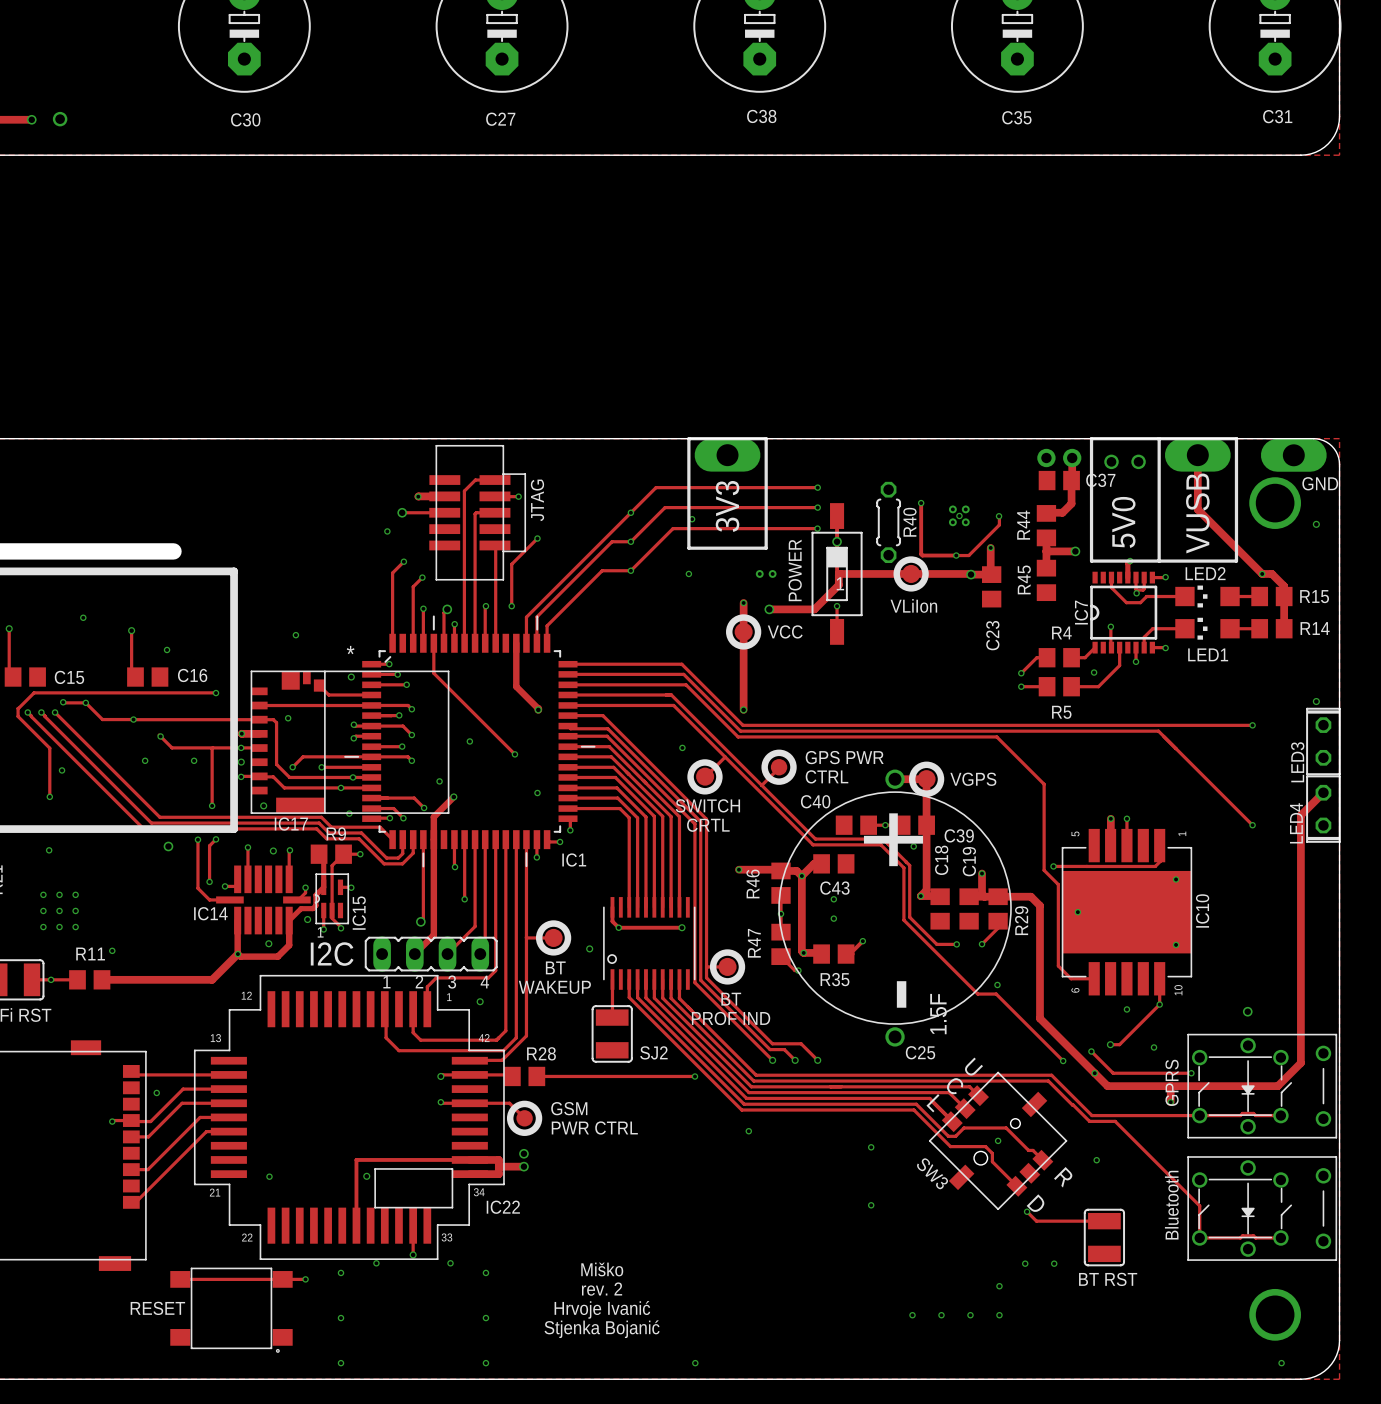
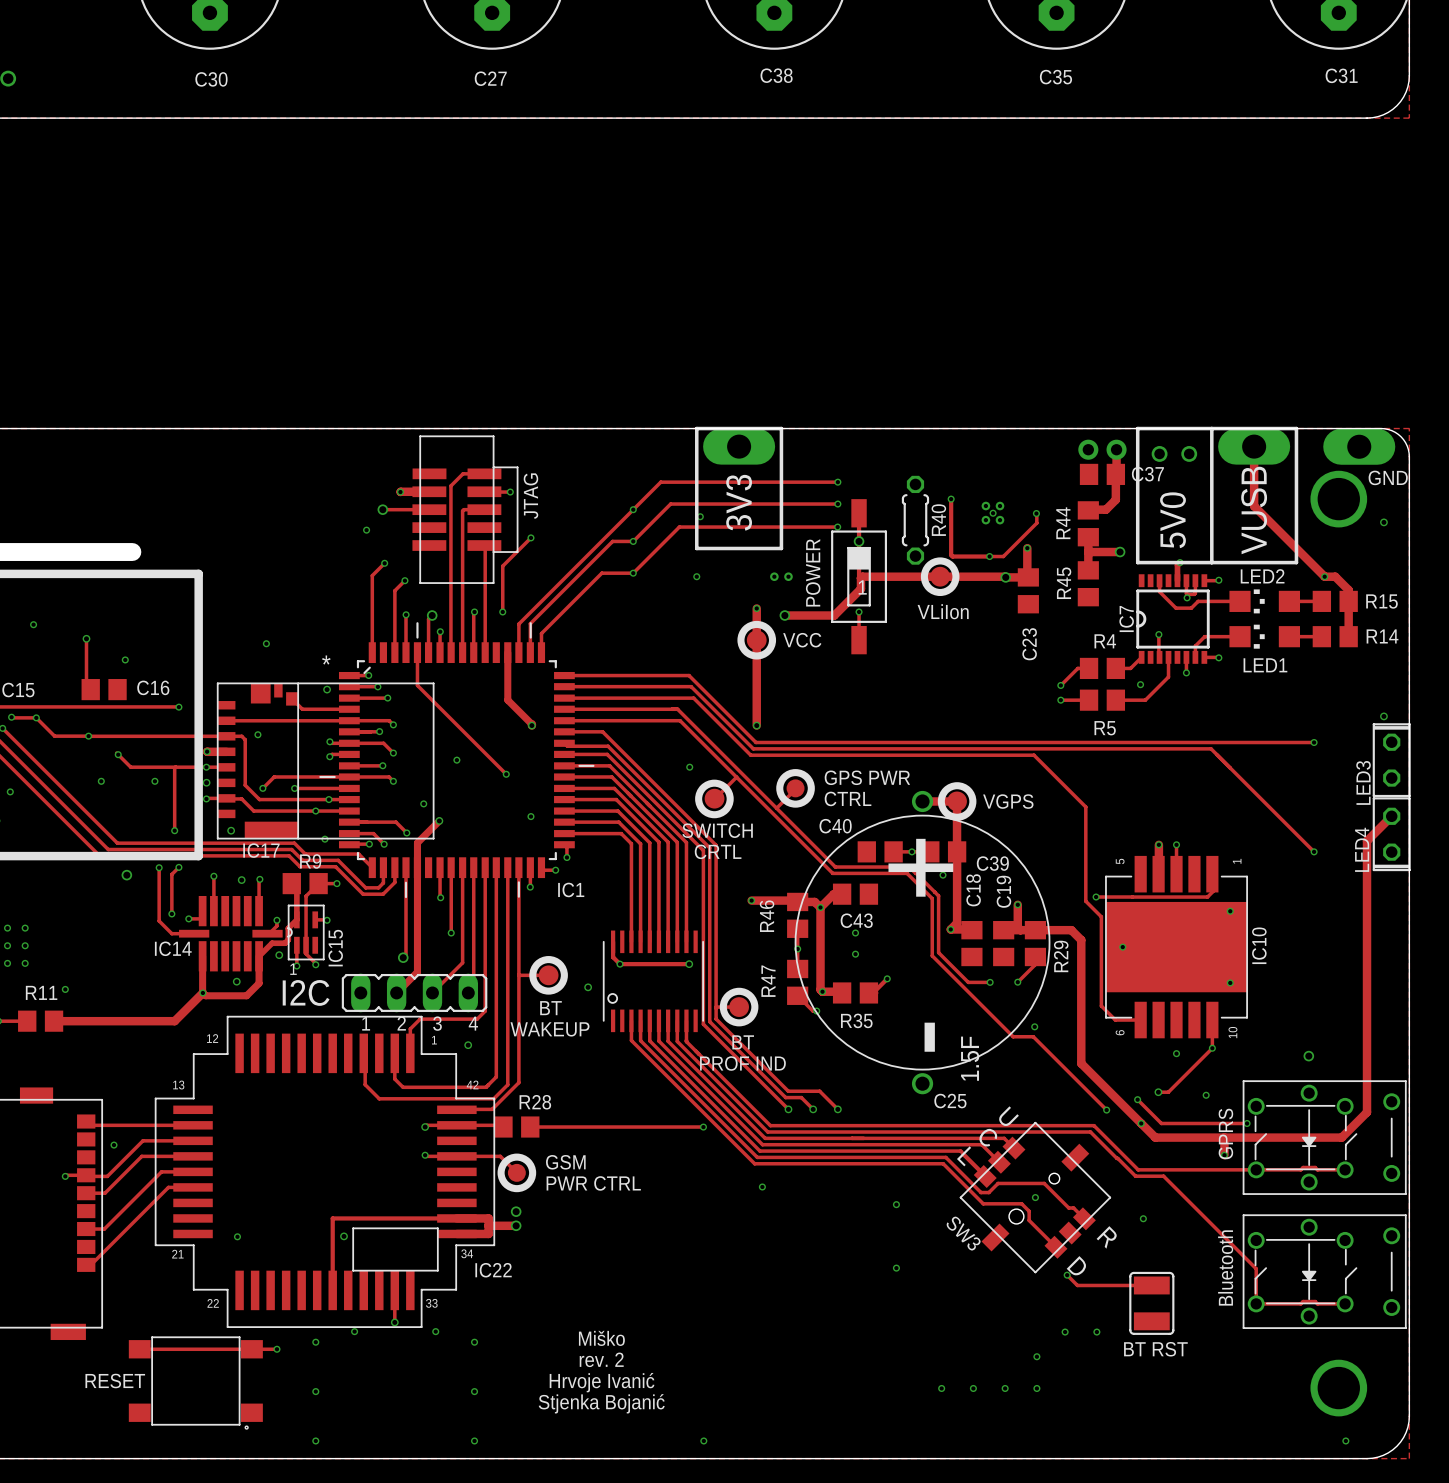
track: (612, 979) (612, 1017) -> none
SJ2: (612, 1033) -> none

